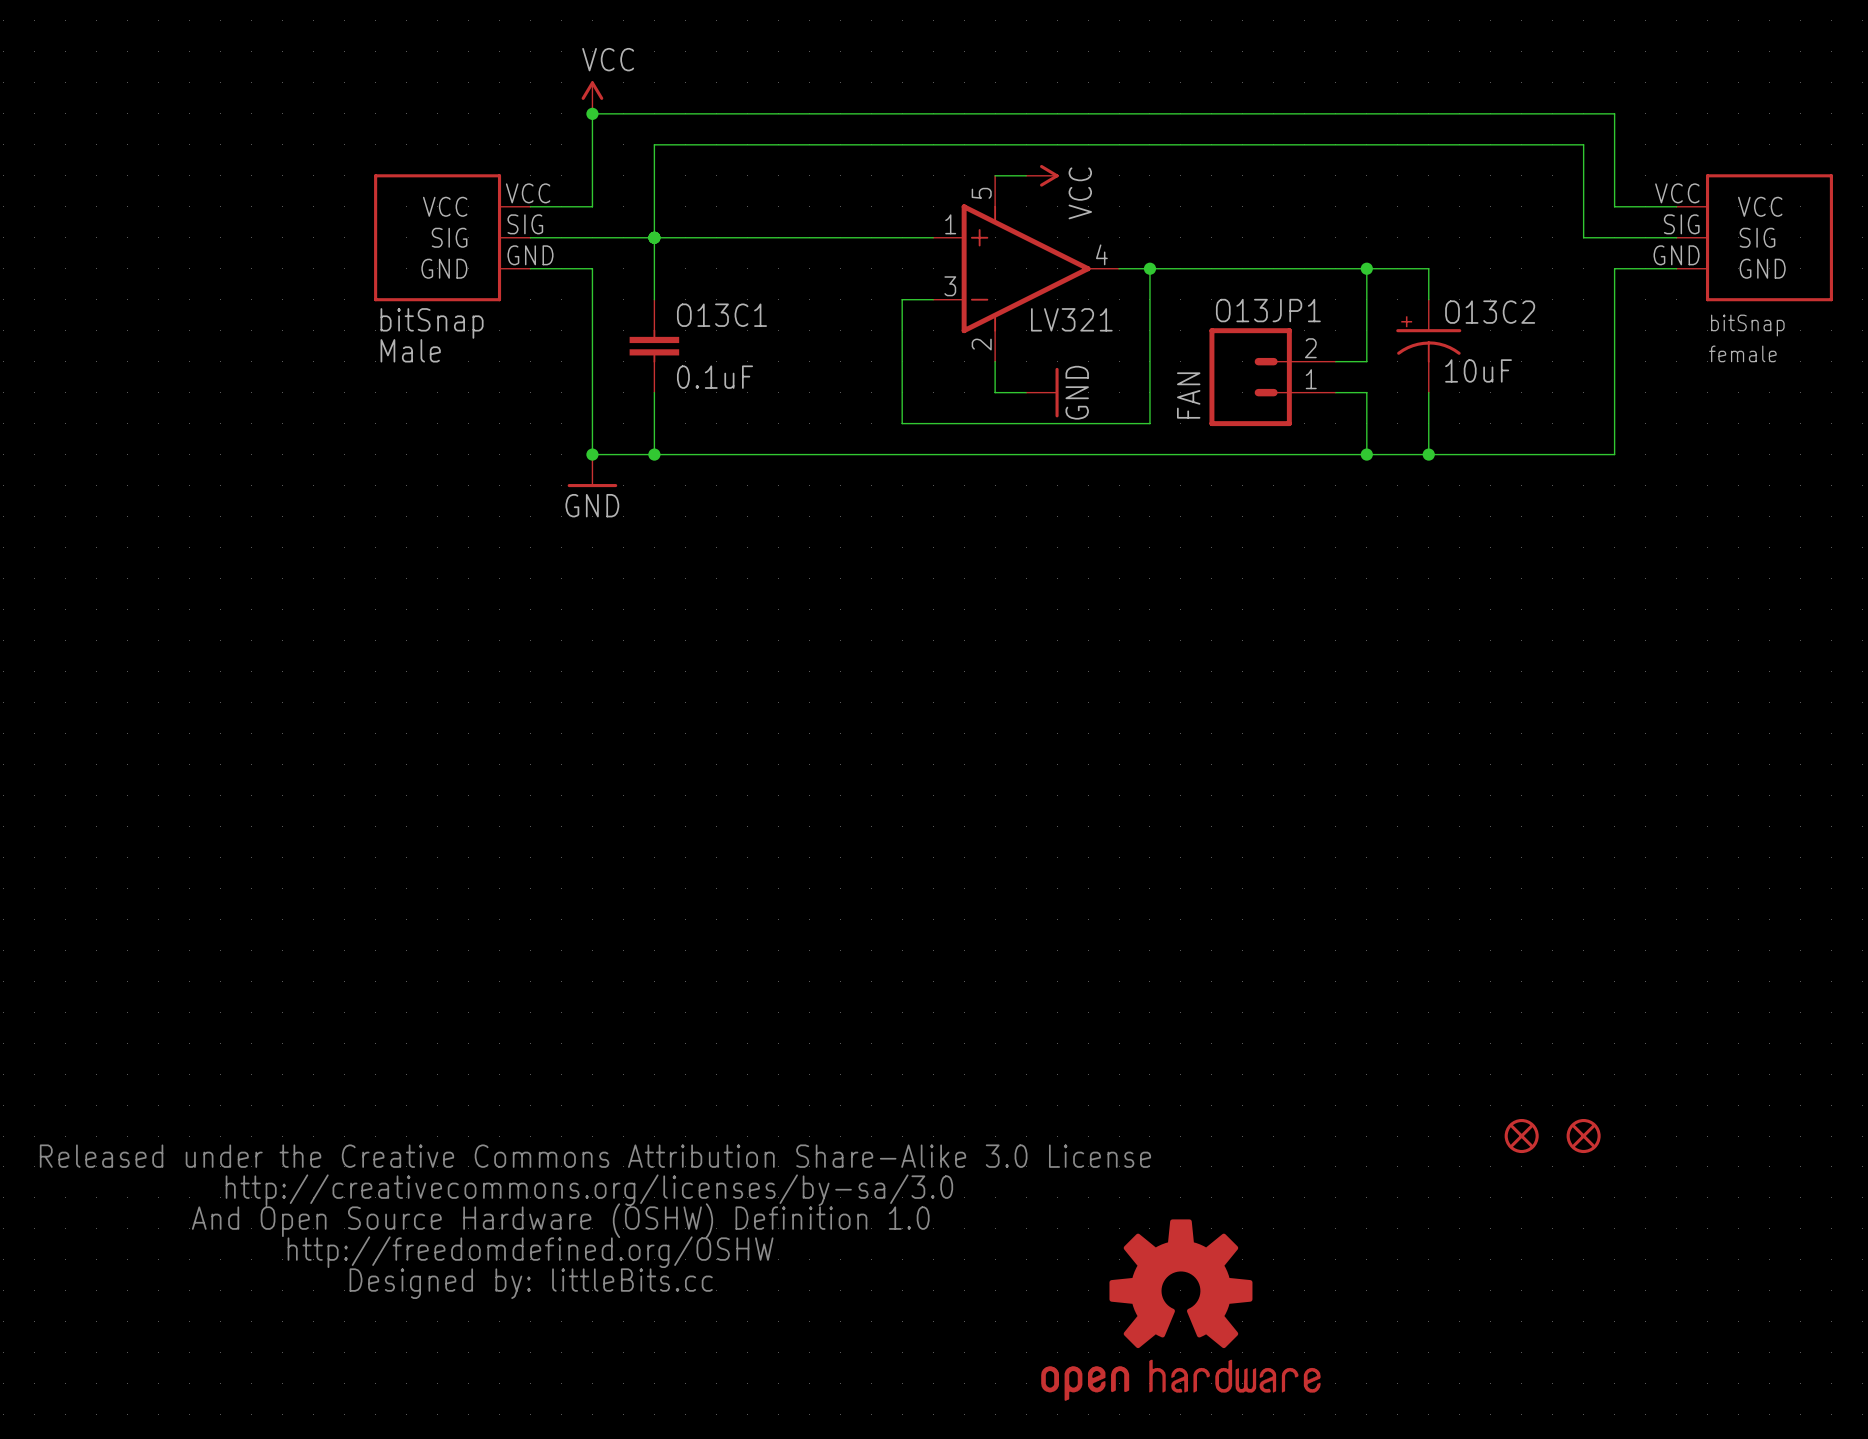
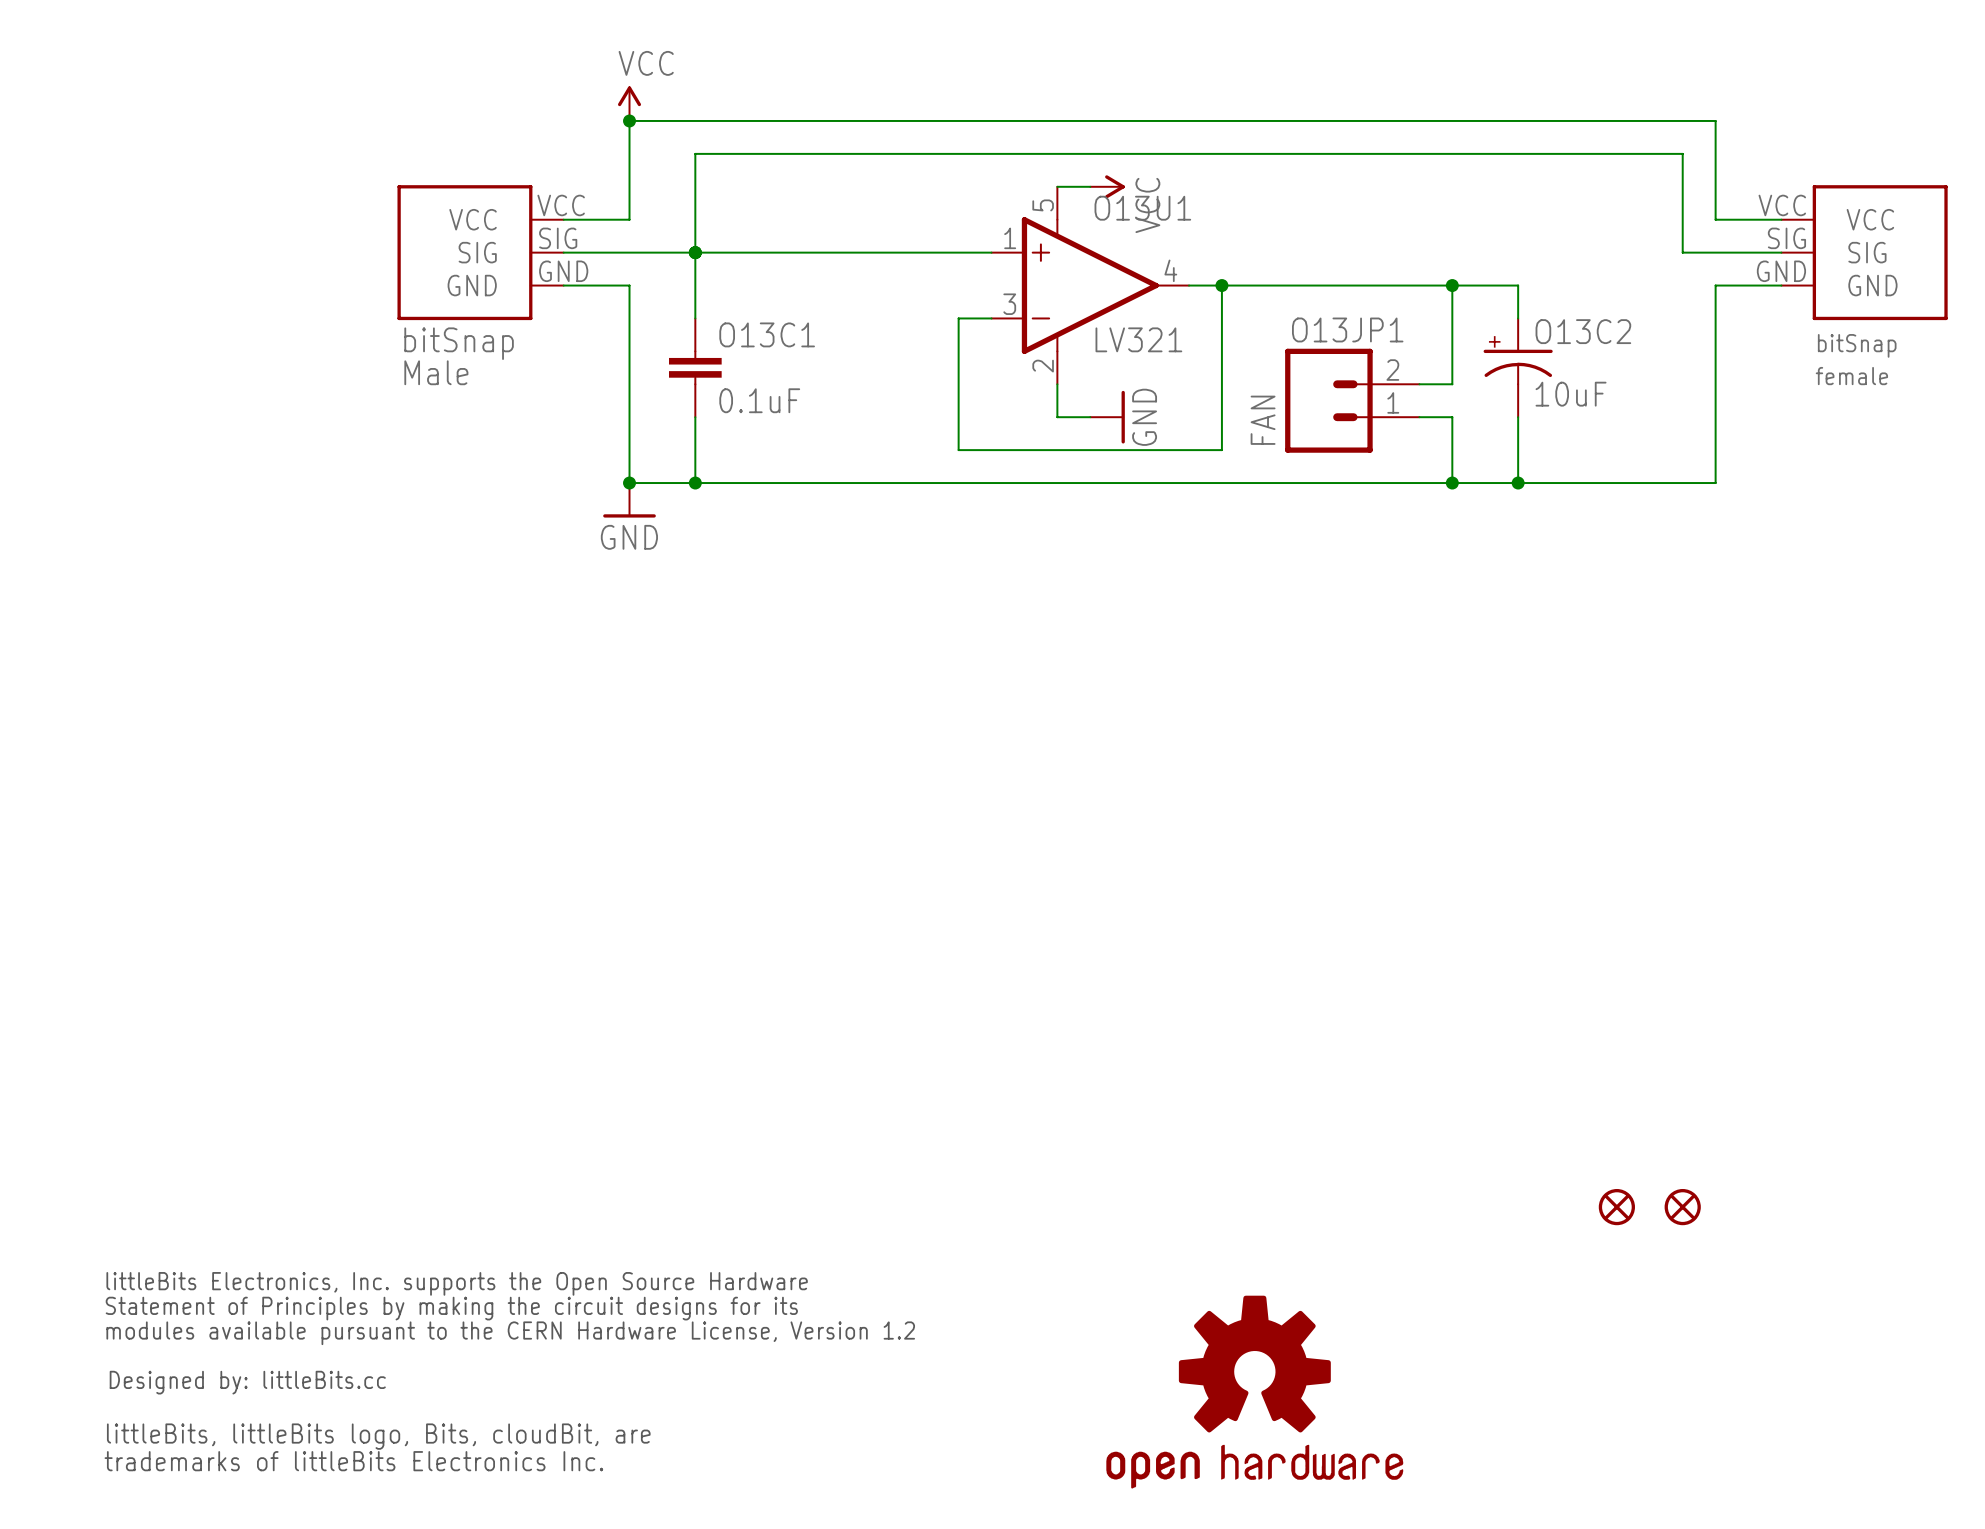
O13U1 name: none -> O13U1 (1142, 208)
part: (595, 1221) -> none
part: none -> (509, 1371)

